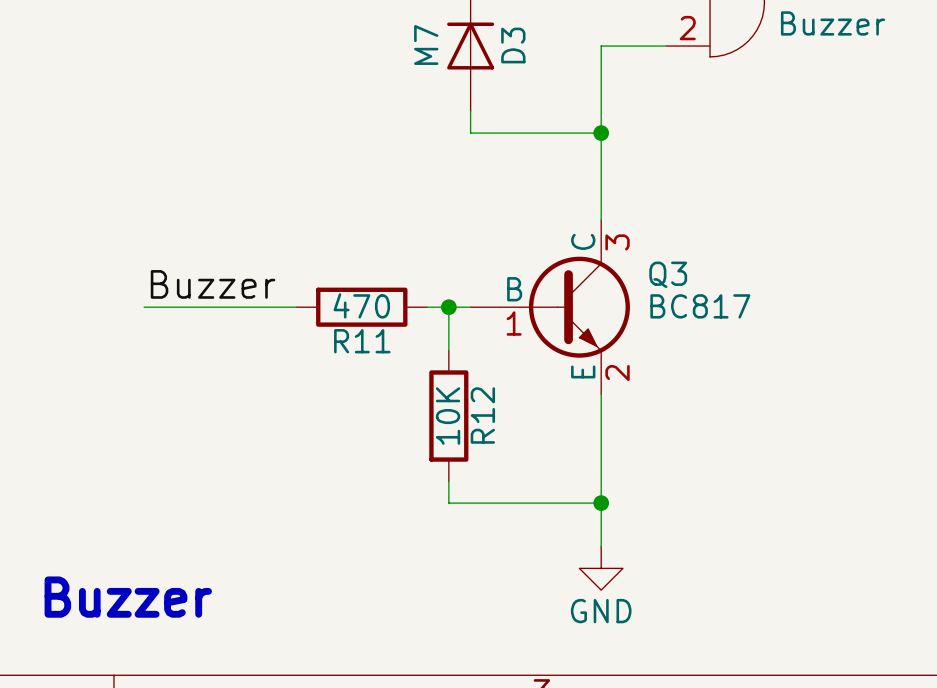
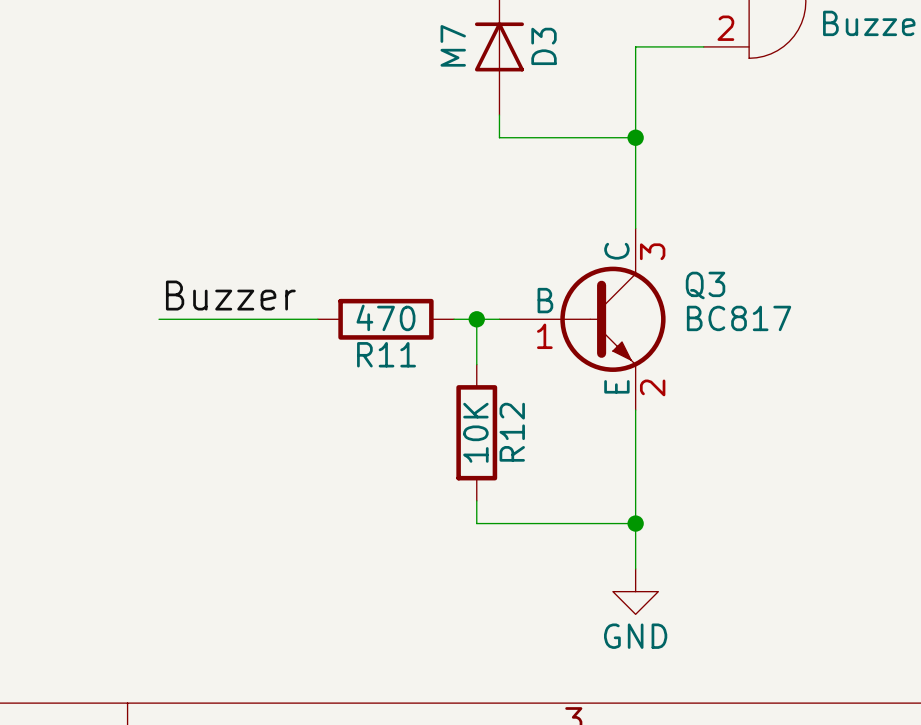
text: Buzzer (128, 597) -> none

